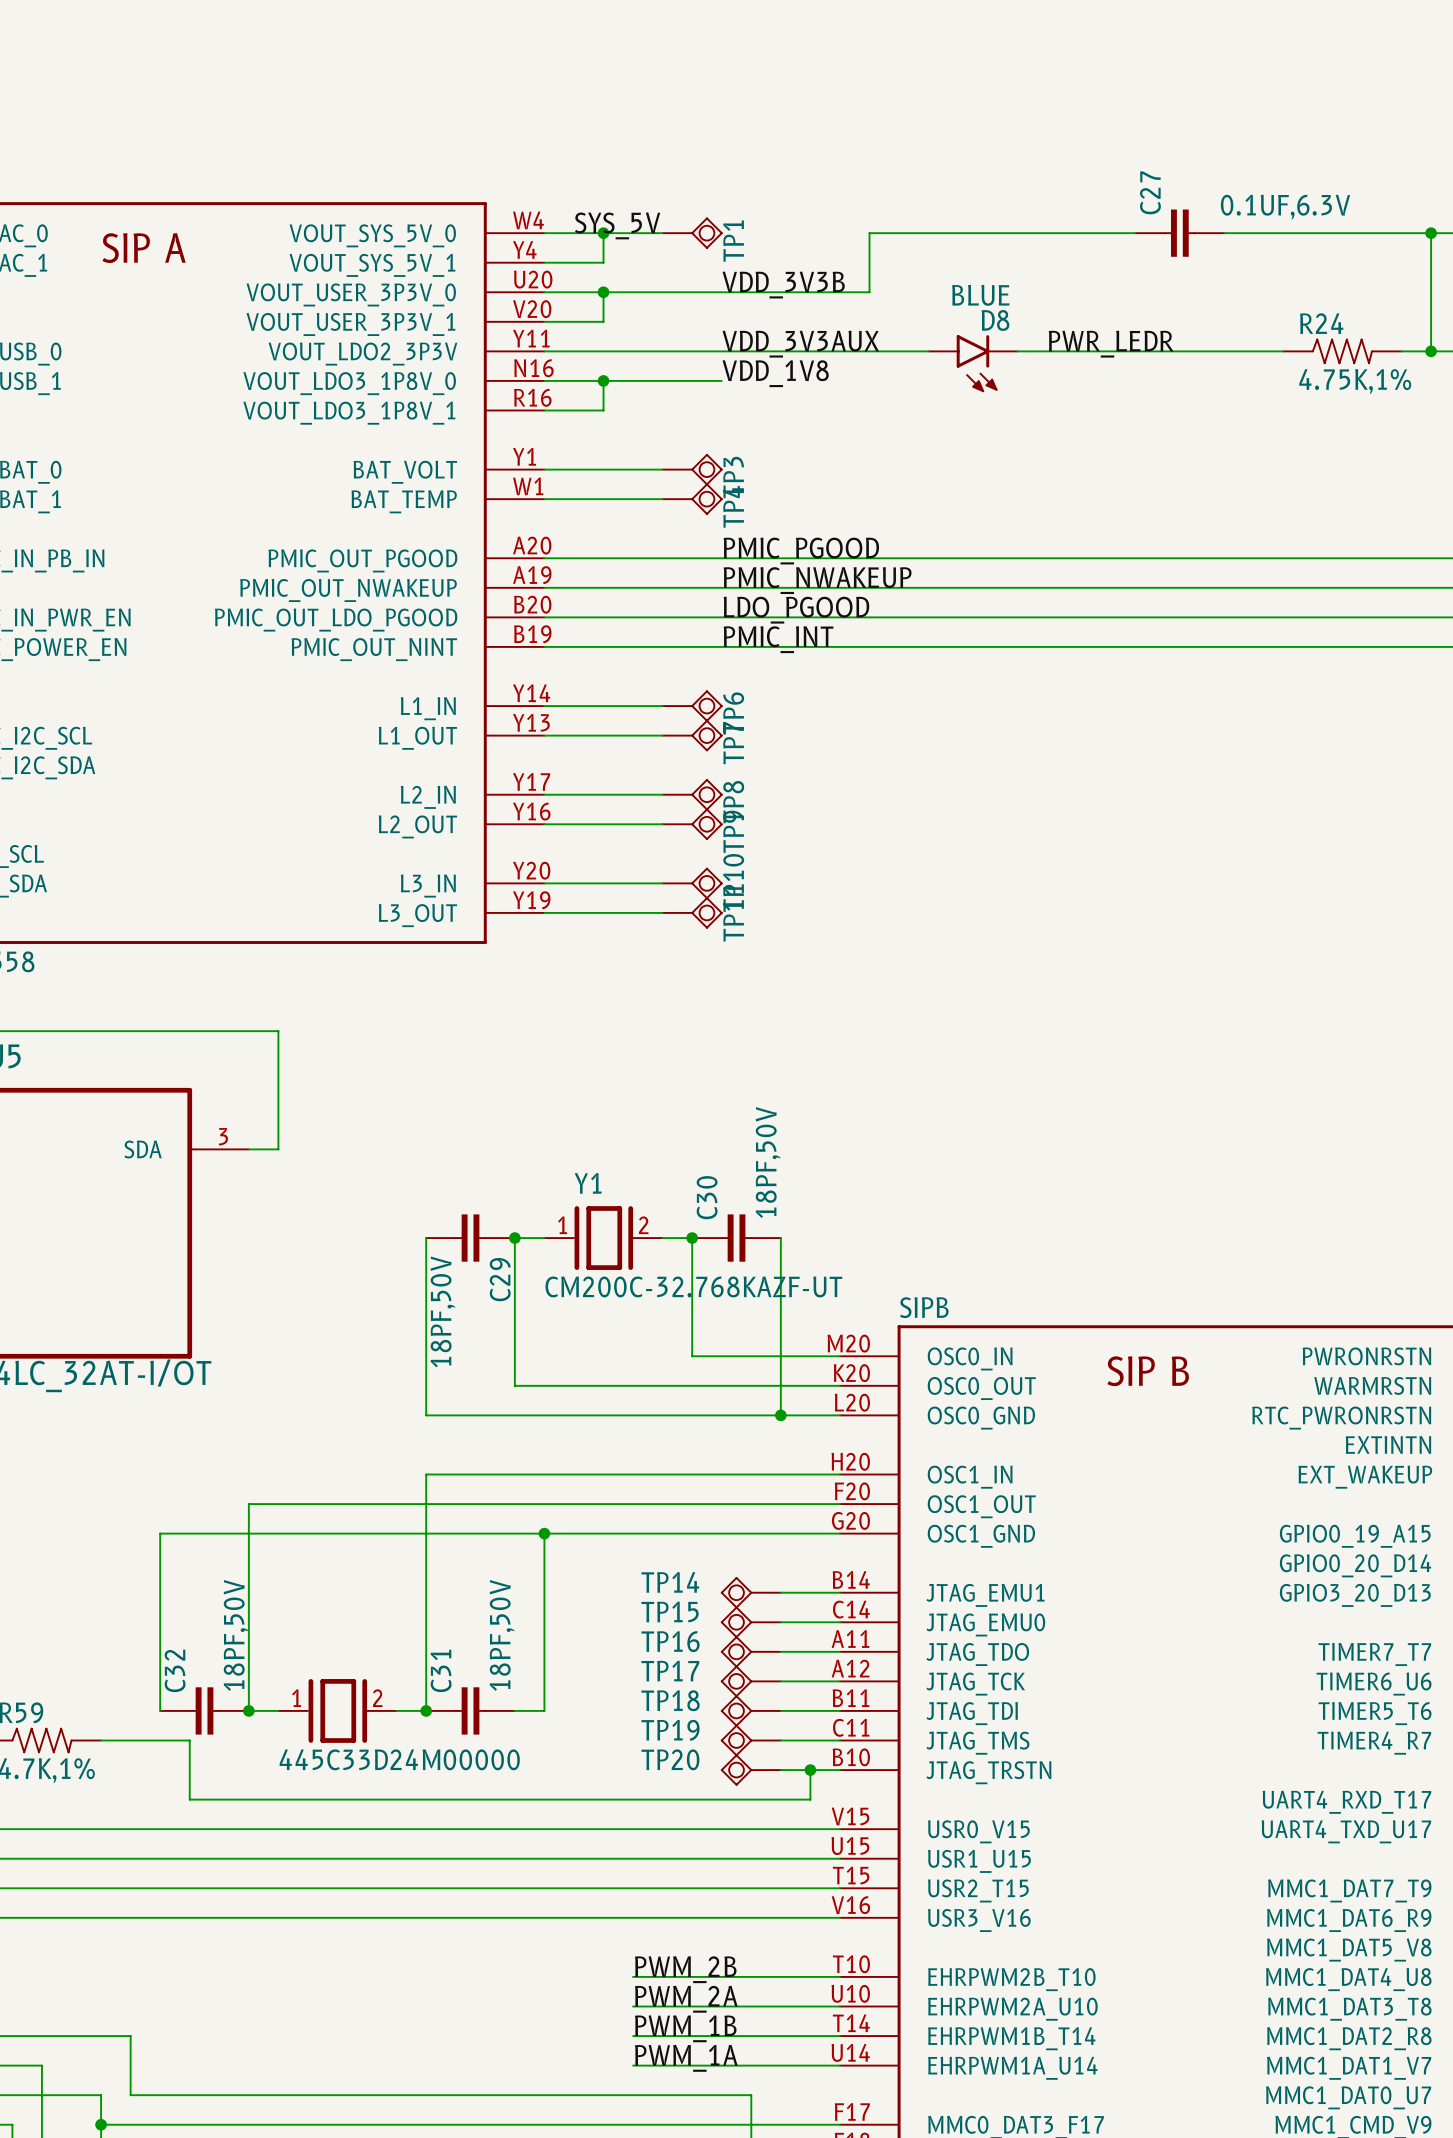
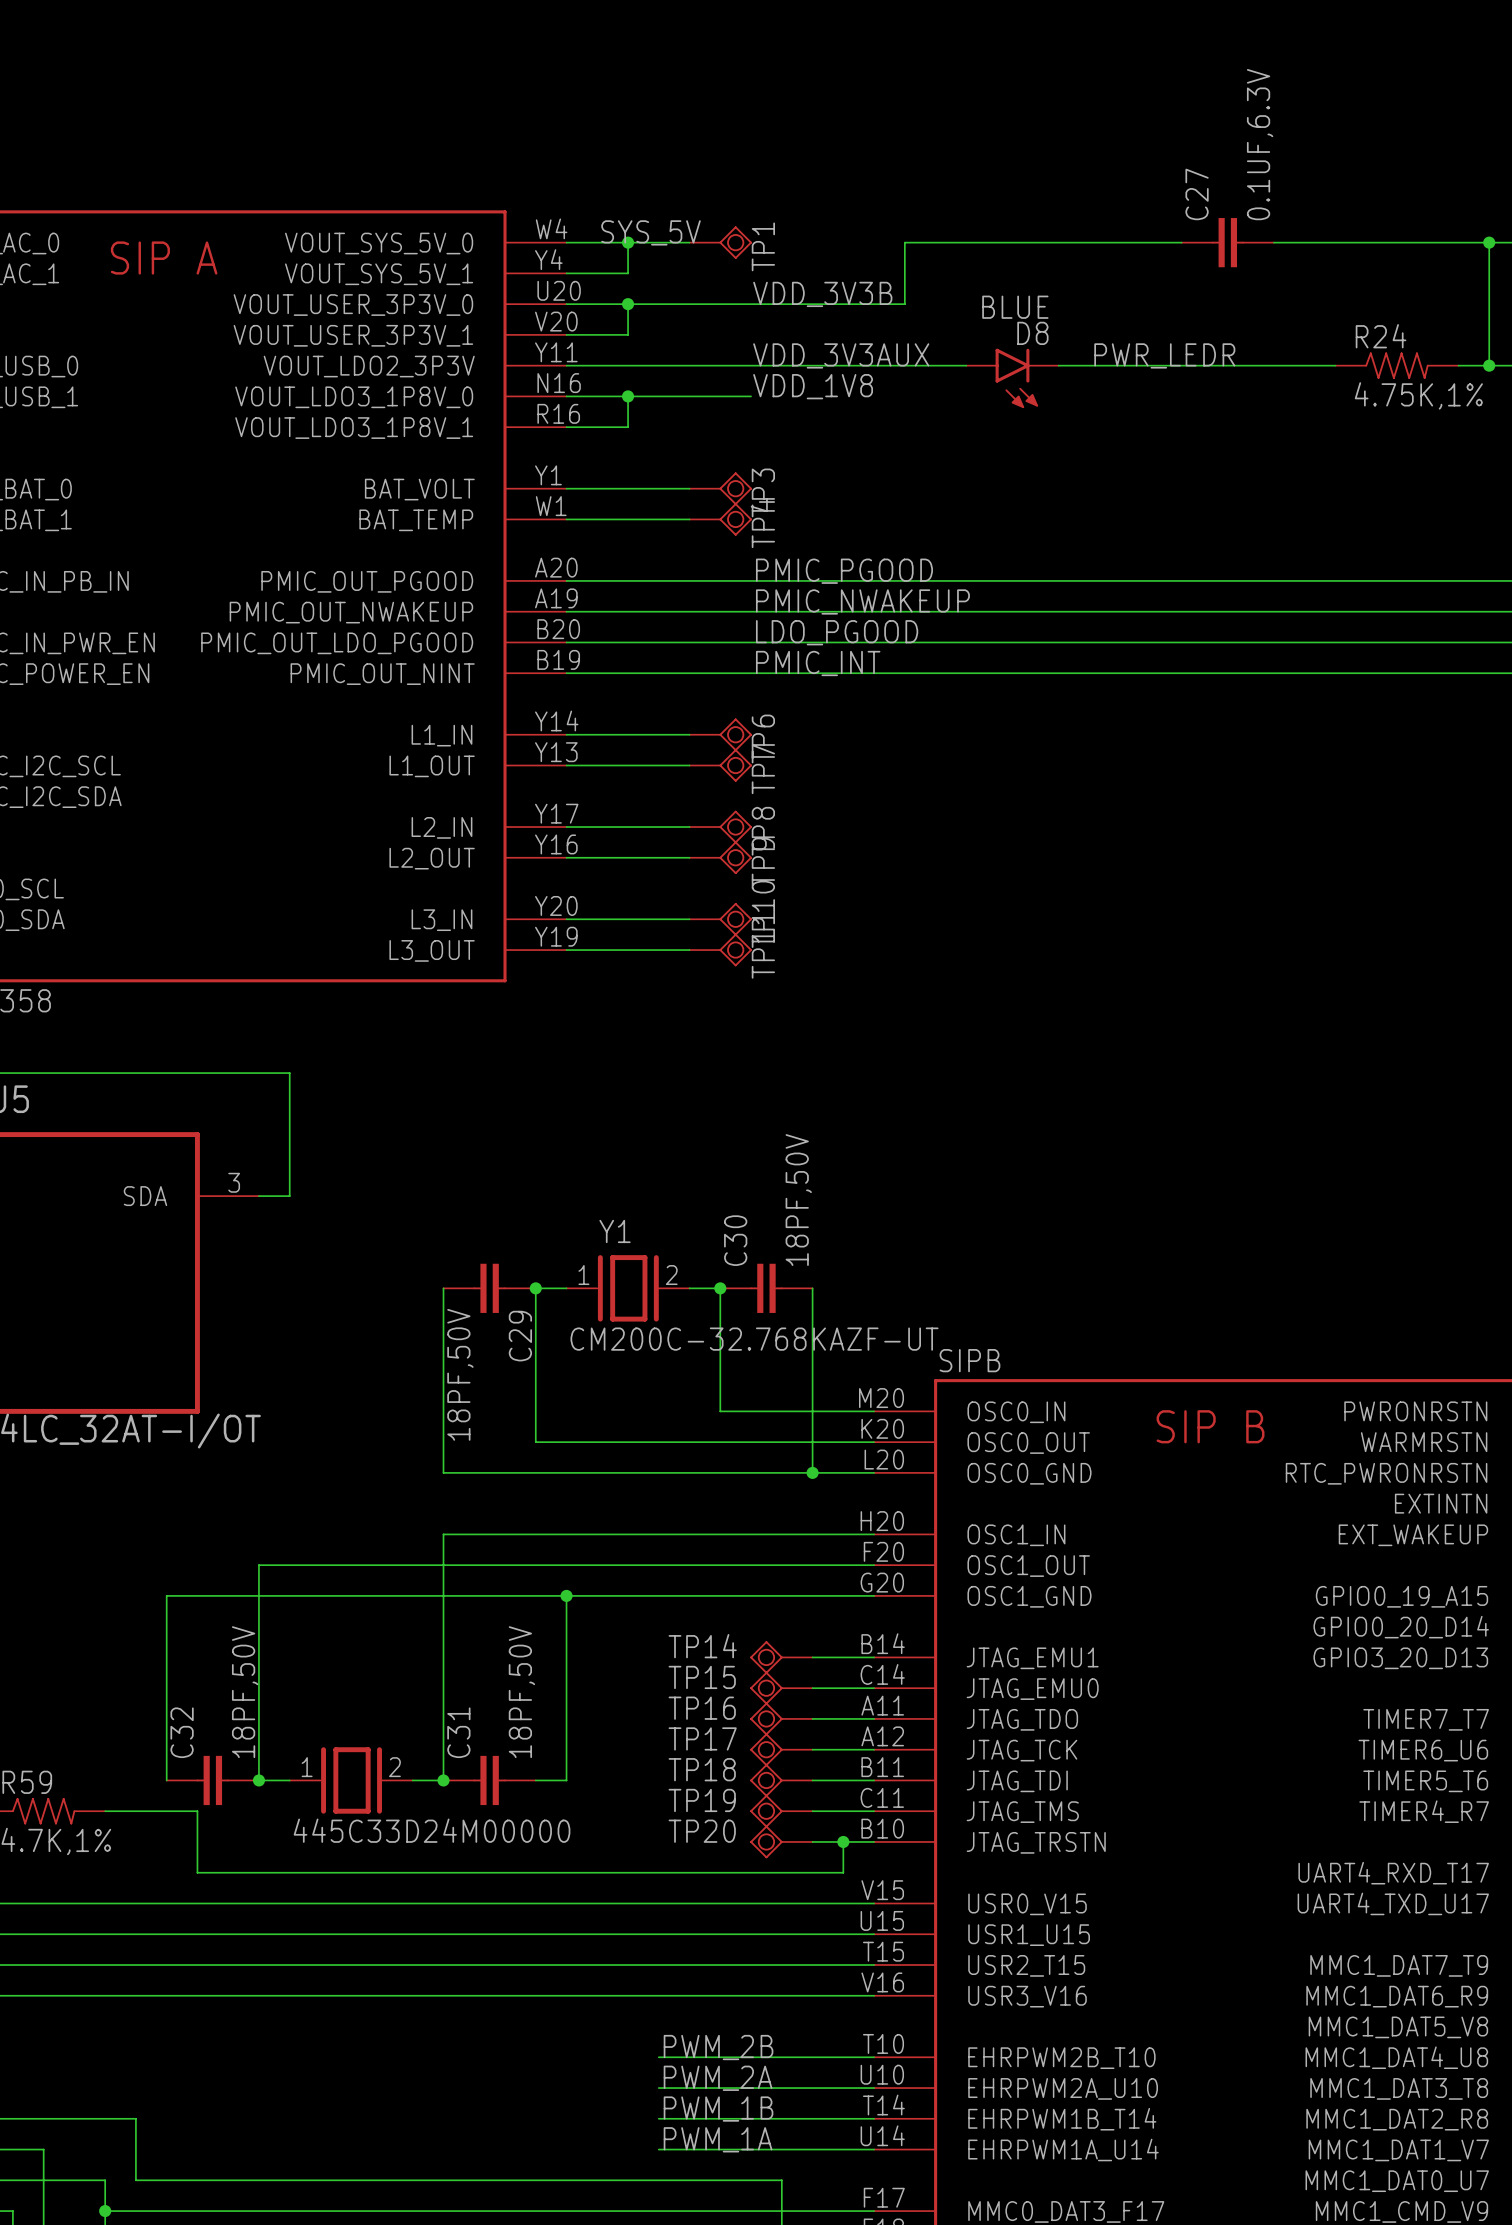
C27 value rotation: 0° (1285, 207) -> 90° counterclockwise (1260, 144)

